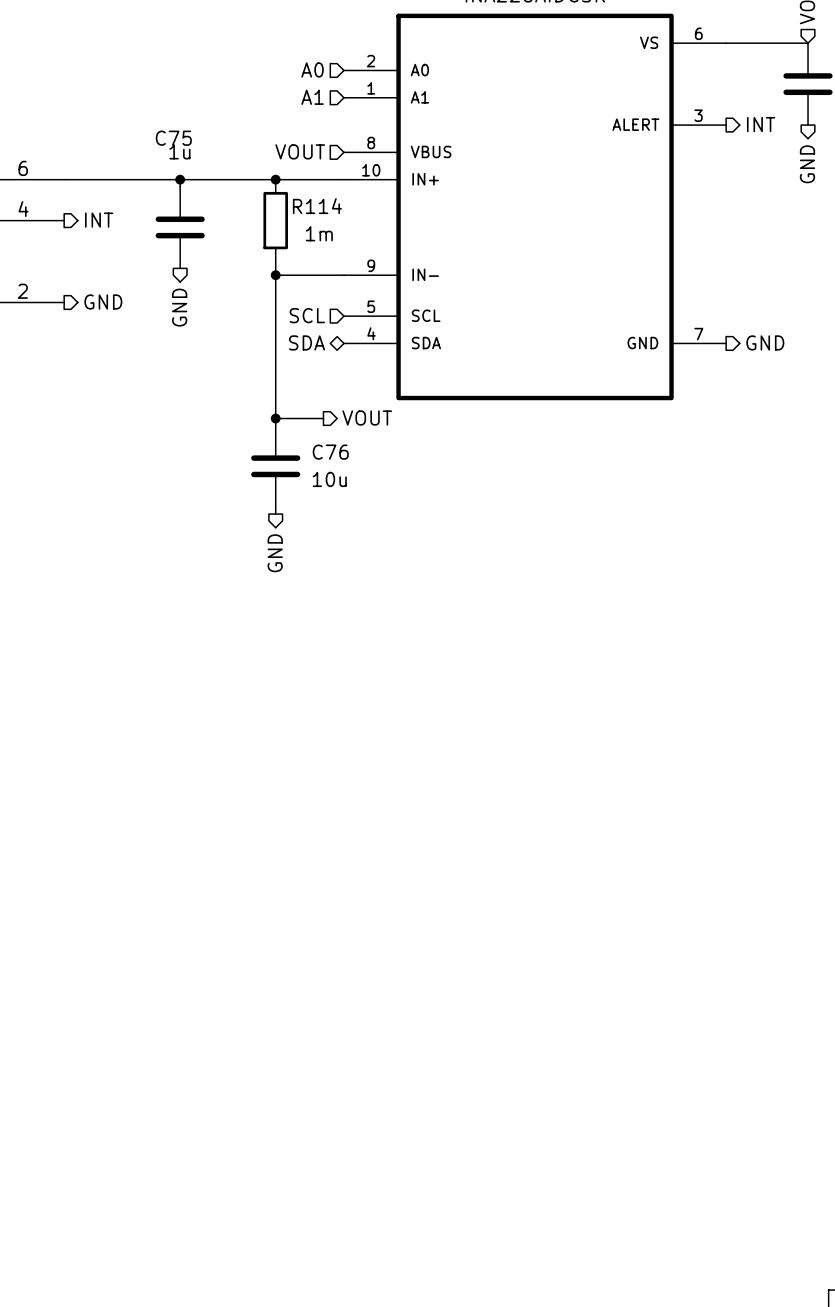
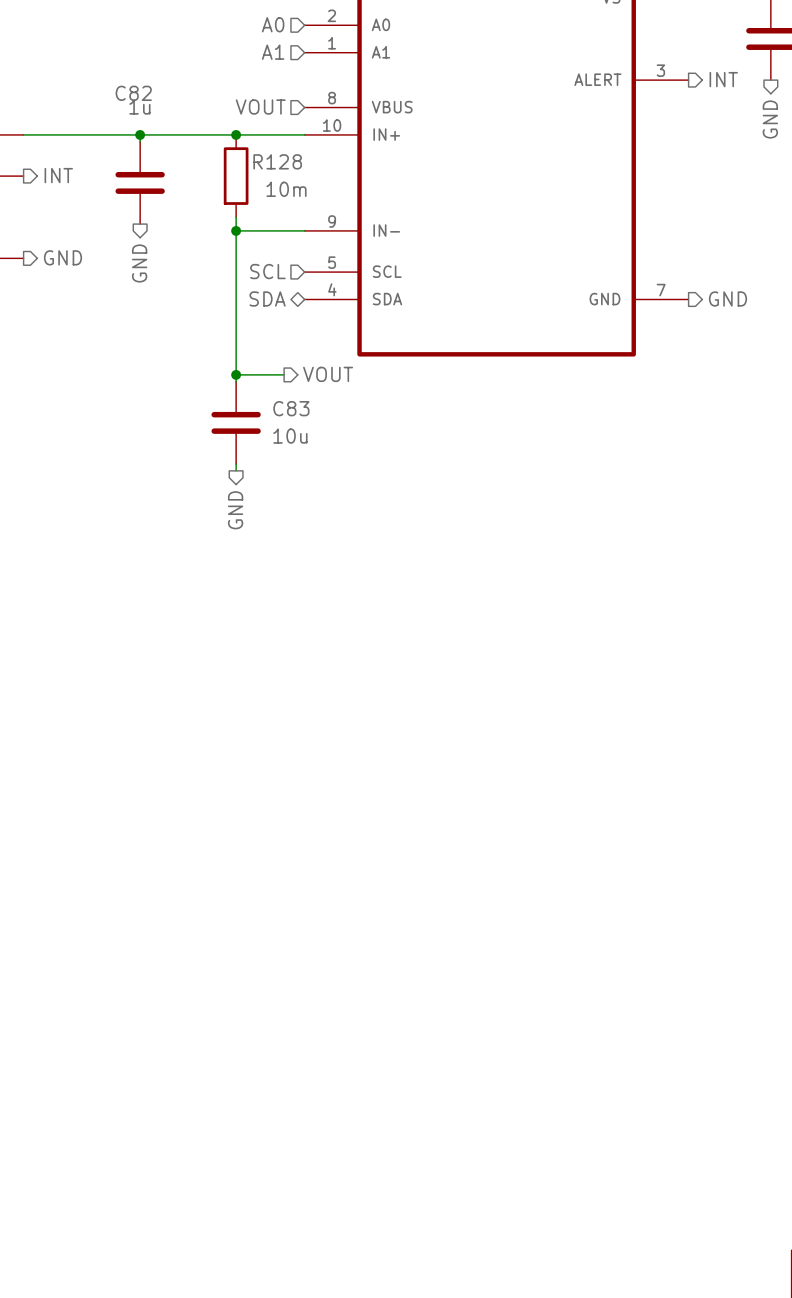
C75 name: C75 (173, 138) -> C82 (133, 93)
R114 name: R114 (317, 206) -> R128 (277, 161)
R114 value: 1m (319, 233) -> 10m (286, 189)
C76 name: C76 (330, 452) -> C83 (291, 408)

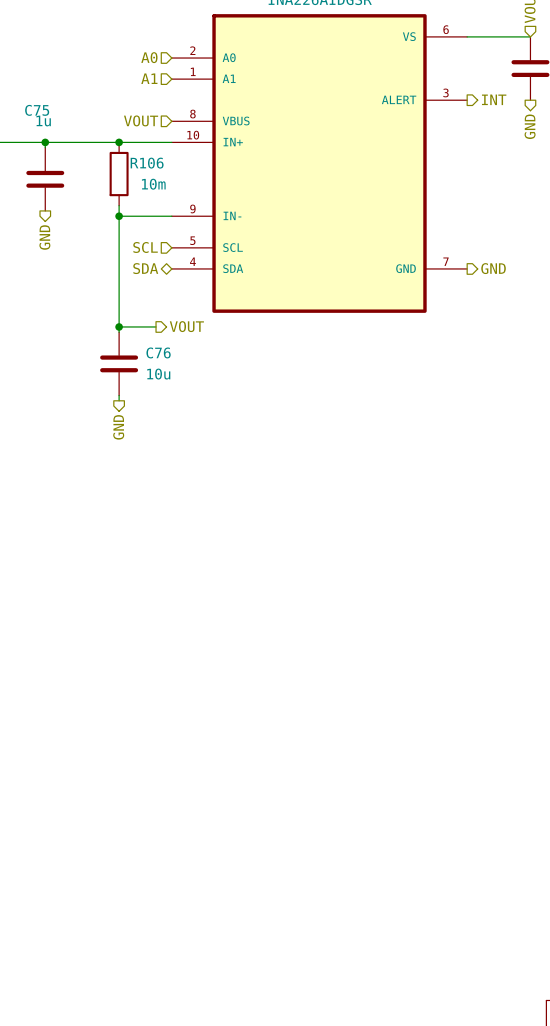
C82 name: C82 (133, 93) -> C75 (37, 110)
R128 name: R128 (277, 161) -> R106 (147, 163)
C83 name: C83 (291, 408) -> C76 (158, 352)

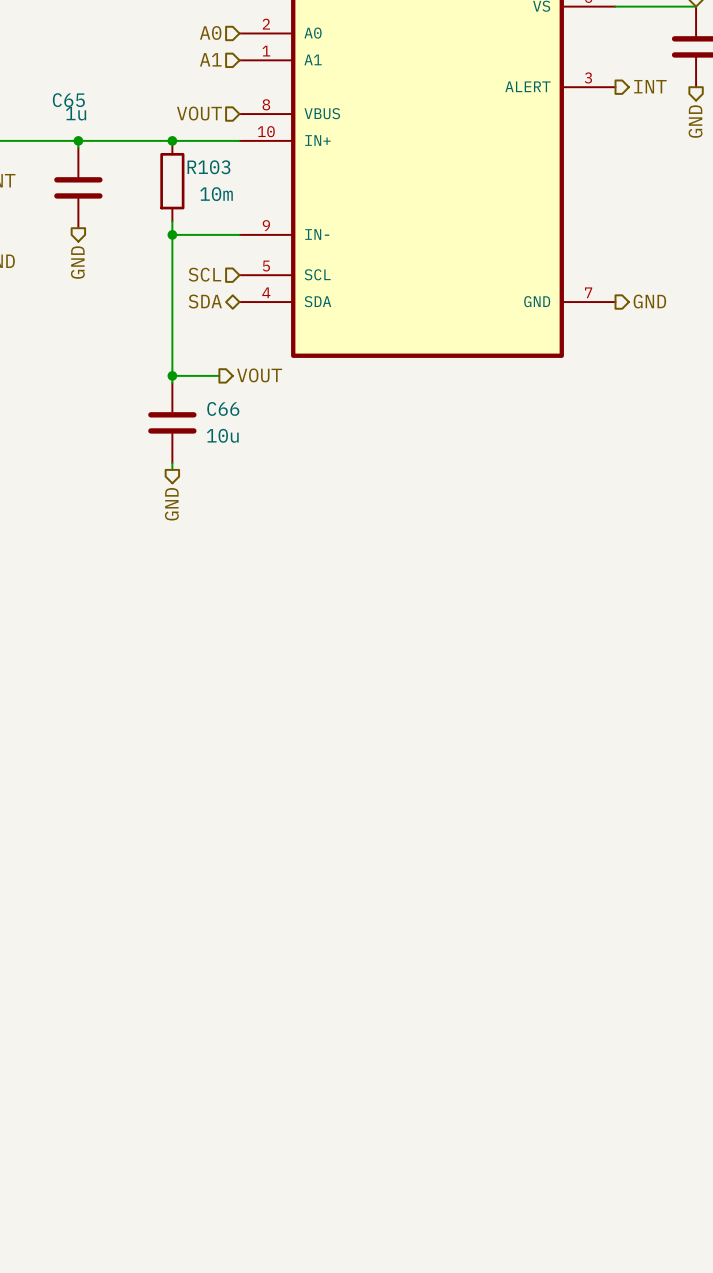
C75 name: C75 (37, 110) -> C65 (68, 100)
R106 name: R106 (147, 163) -> R103 (208, 167)
C76 name: C76 (158, 352) -> C66 (223, 408)

